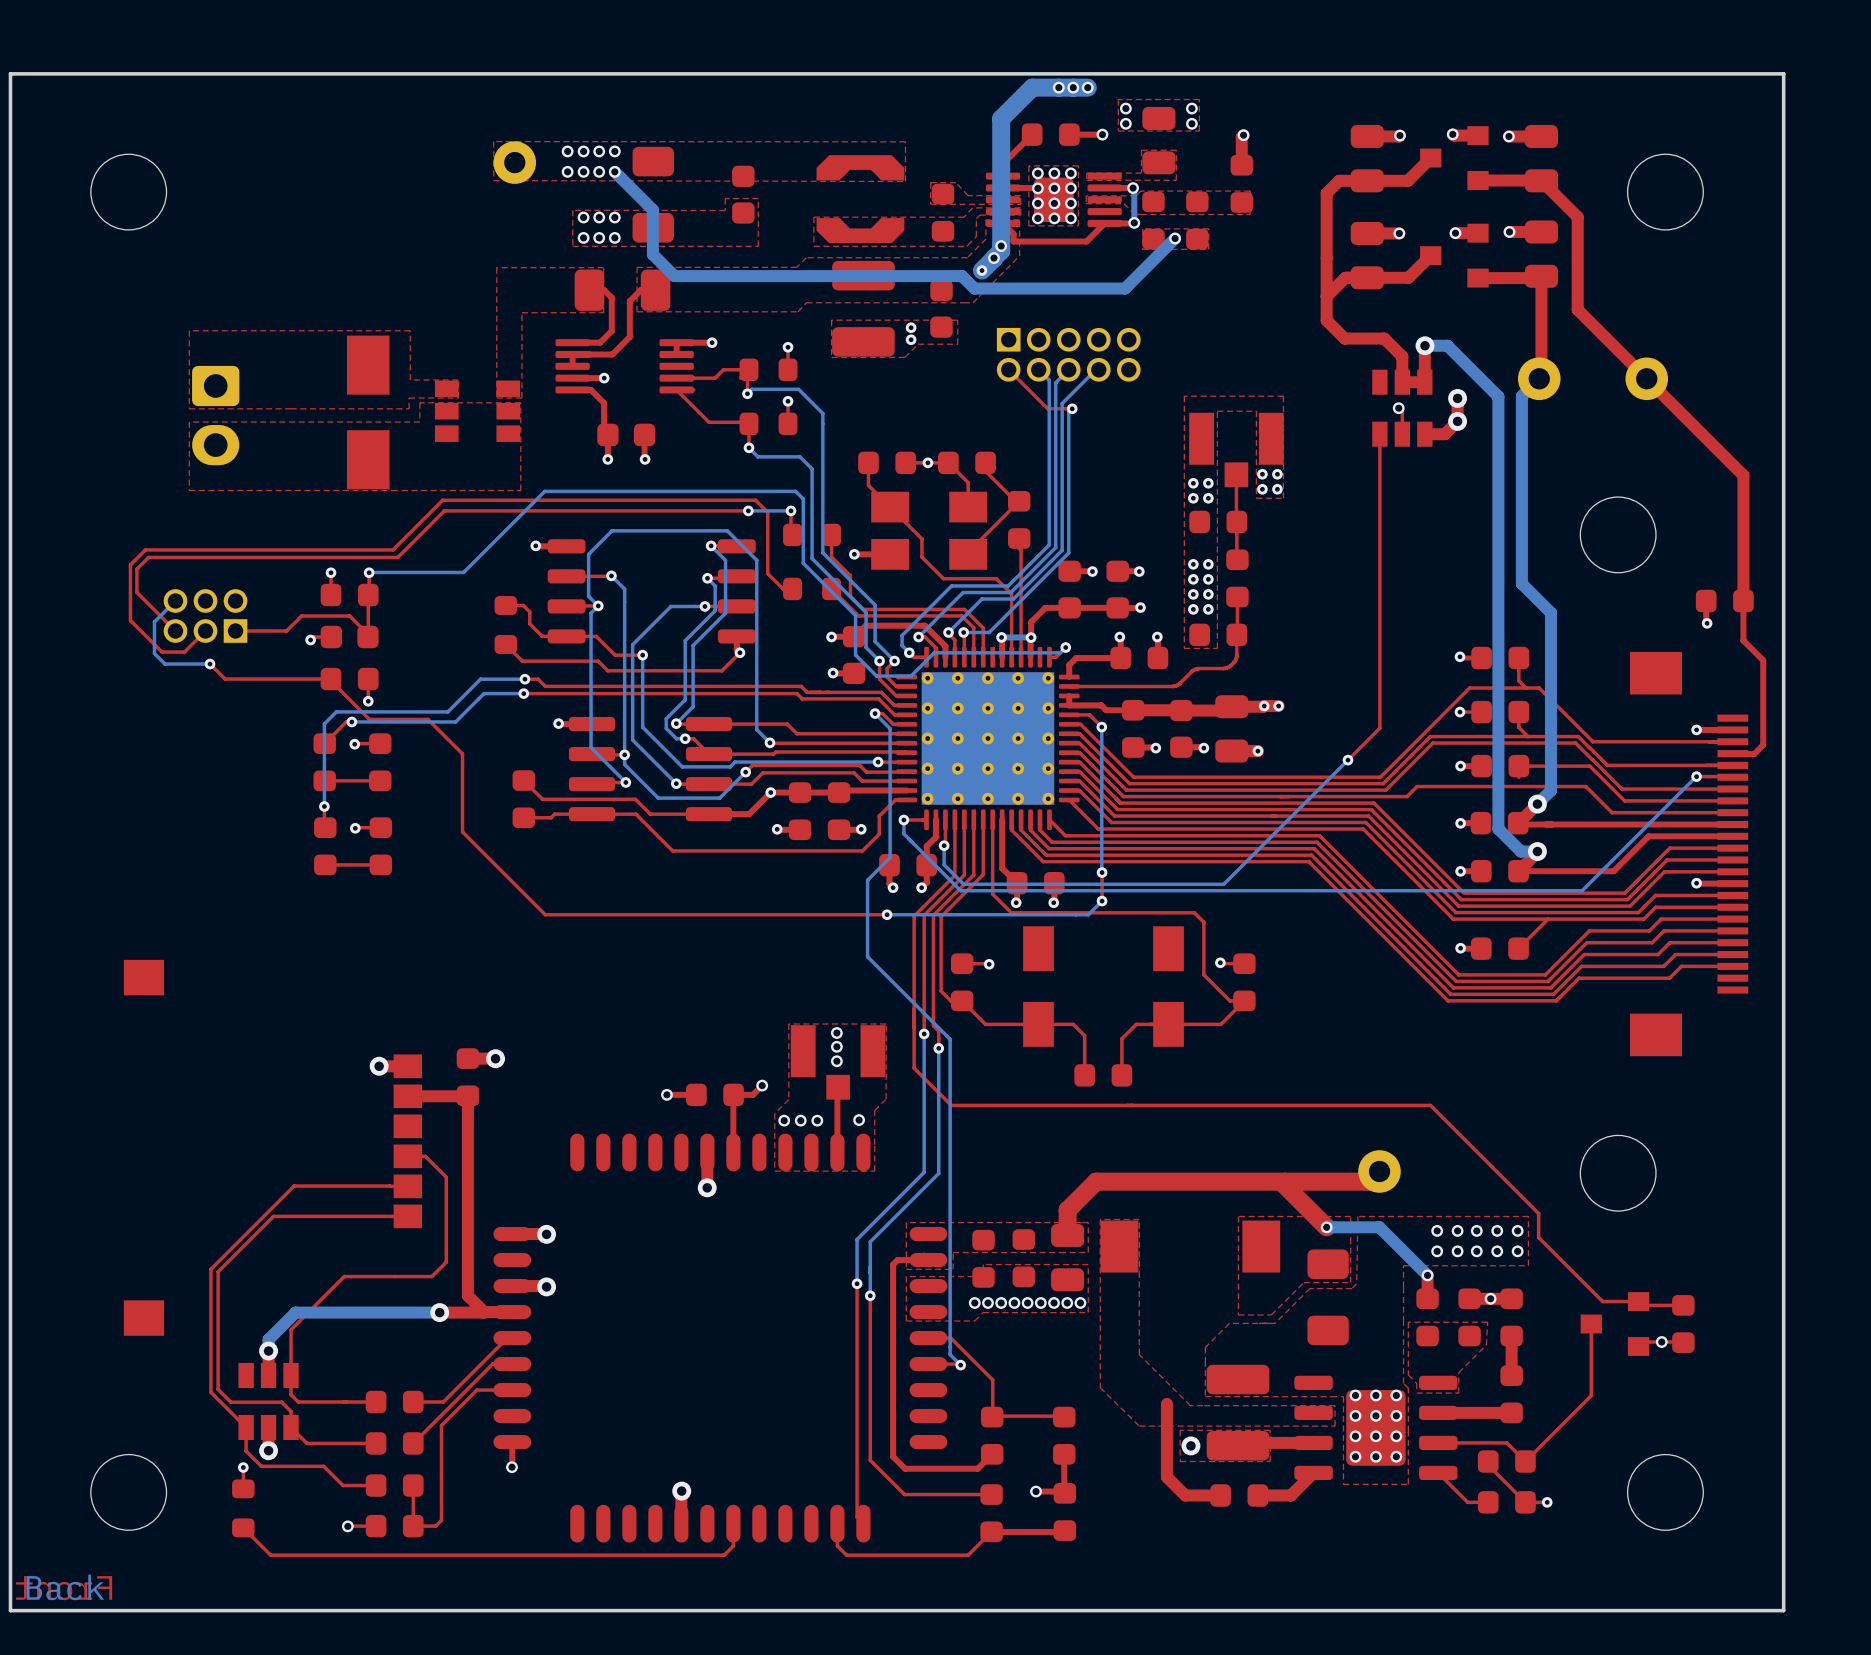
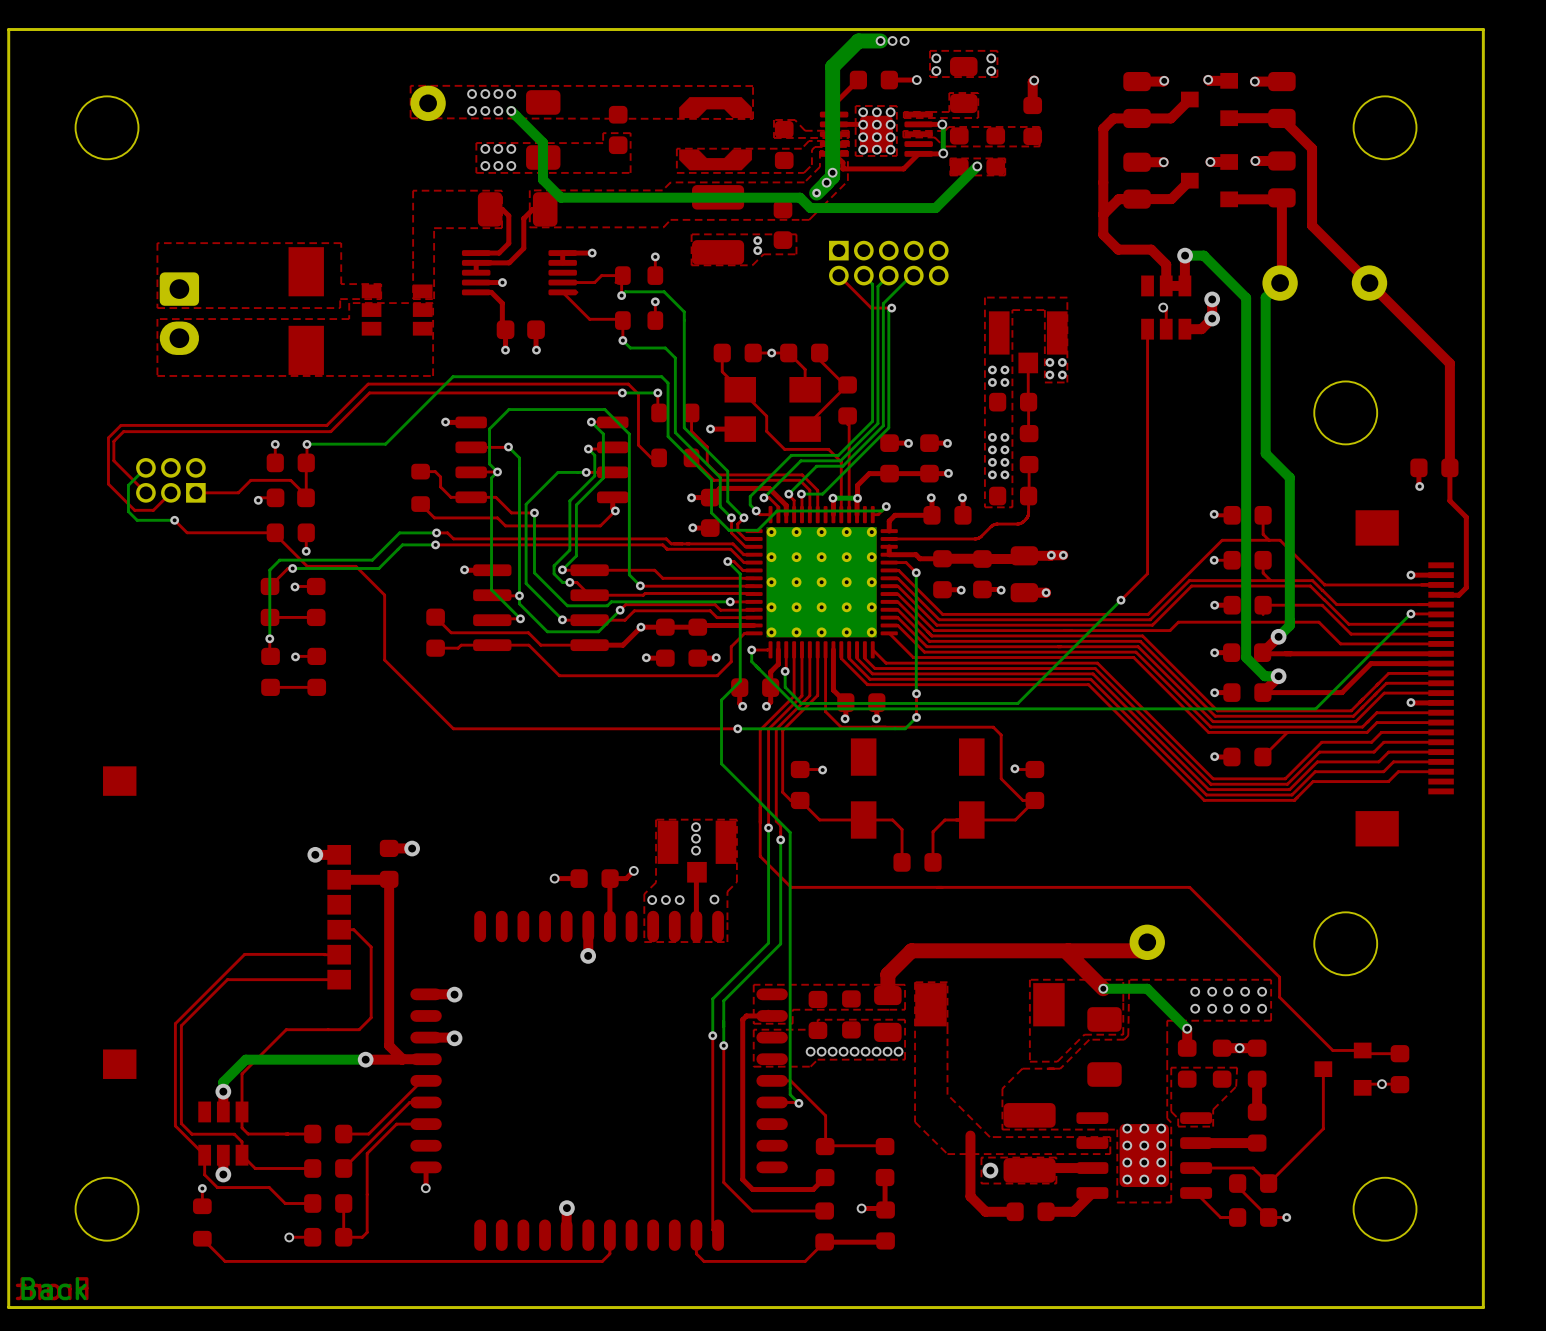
bottom track: (1087, 87) (1058, 87) -> none

